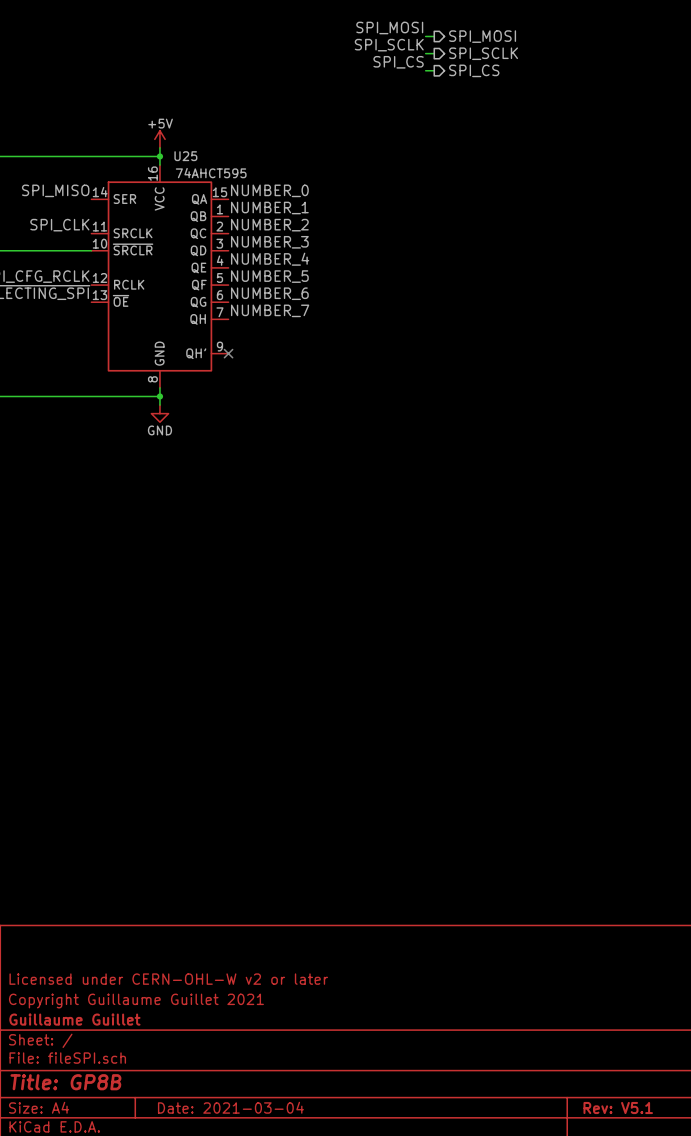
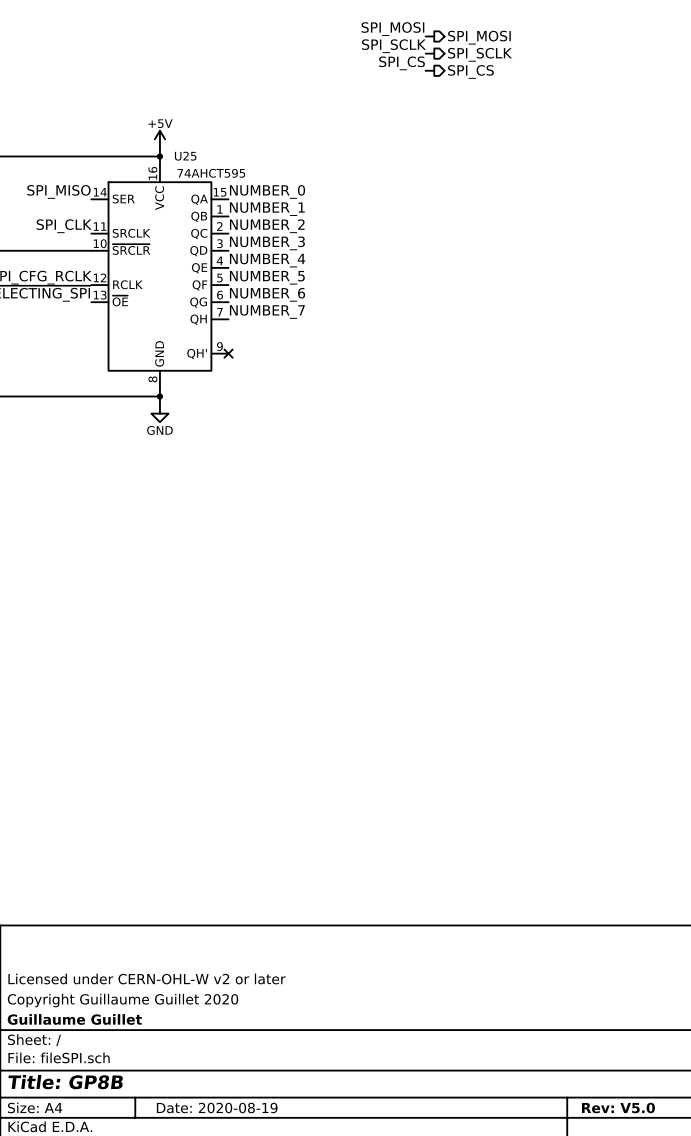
title block: Copyright Guillaume Guillet 2021 (136, 1001) -> Copyright Guillaume Guillet 2020 (123, 1000)
title block: Date: 2021-03-04 (230, 1107) -> Date: 2020-08-19 (217, 1108)
title block: Rev: V5.1 (618, 1108) -> Rev: V5.0 (618, 1108)

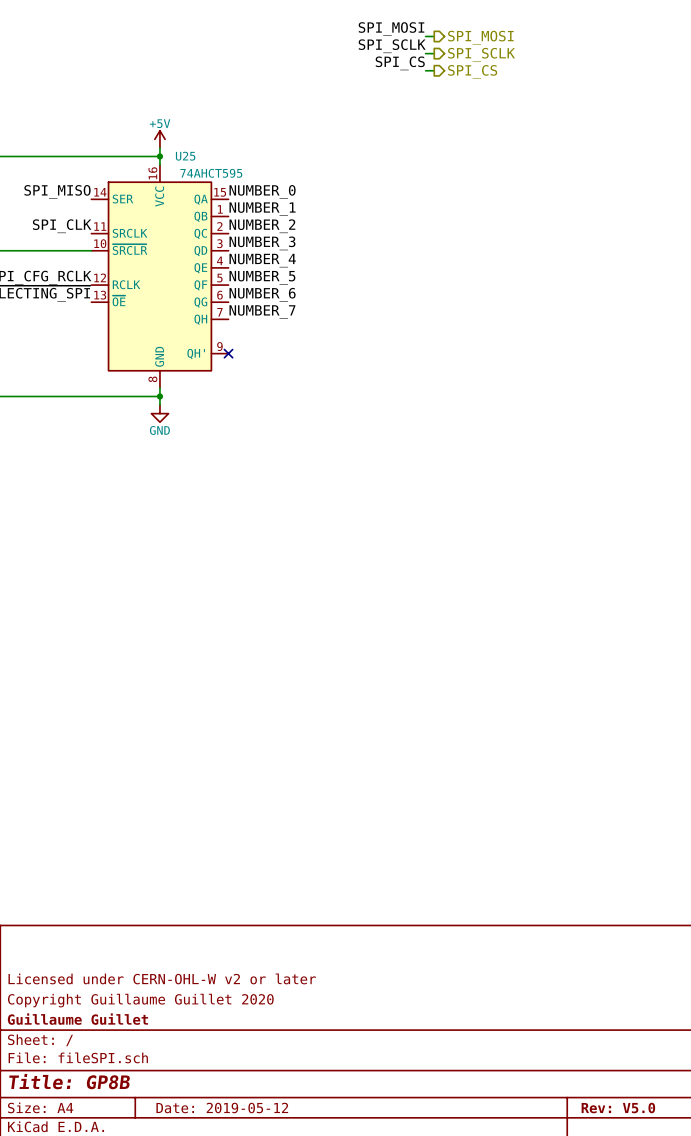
title block: Date: 2020-08-19 (217, 1108) -> Date: 2019-05-12 (222, 1108)

